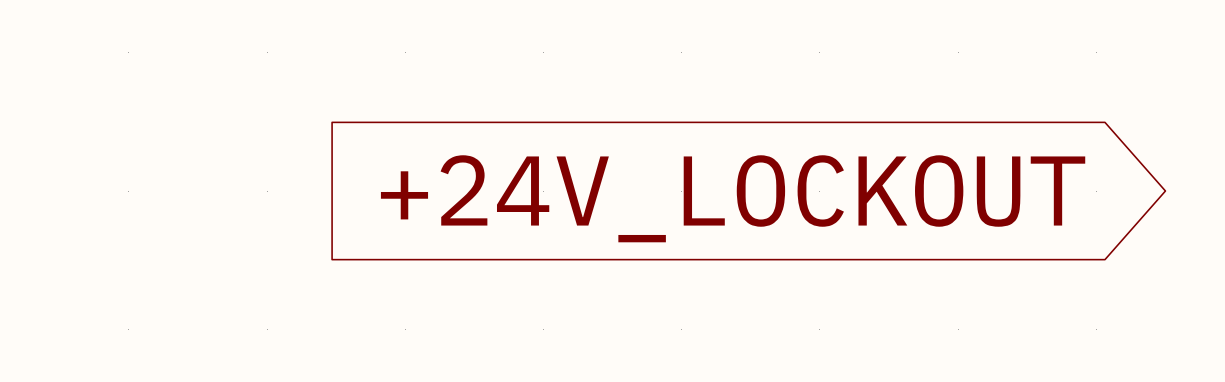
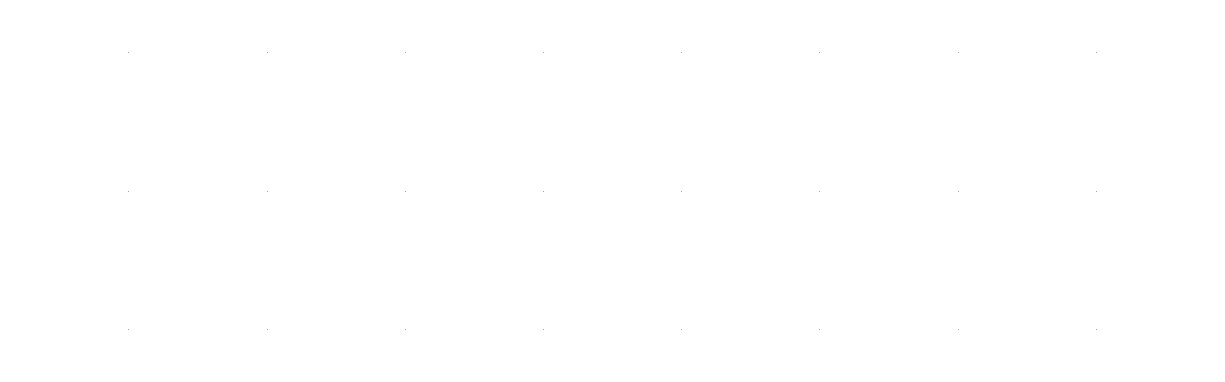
global label: +24V_LOCKOUT (733, 198) -> none

